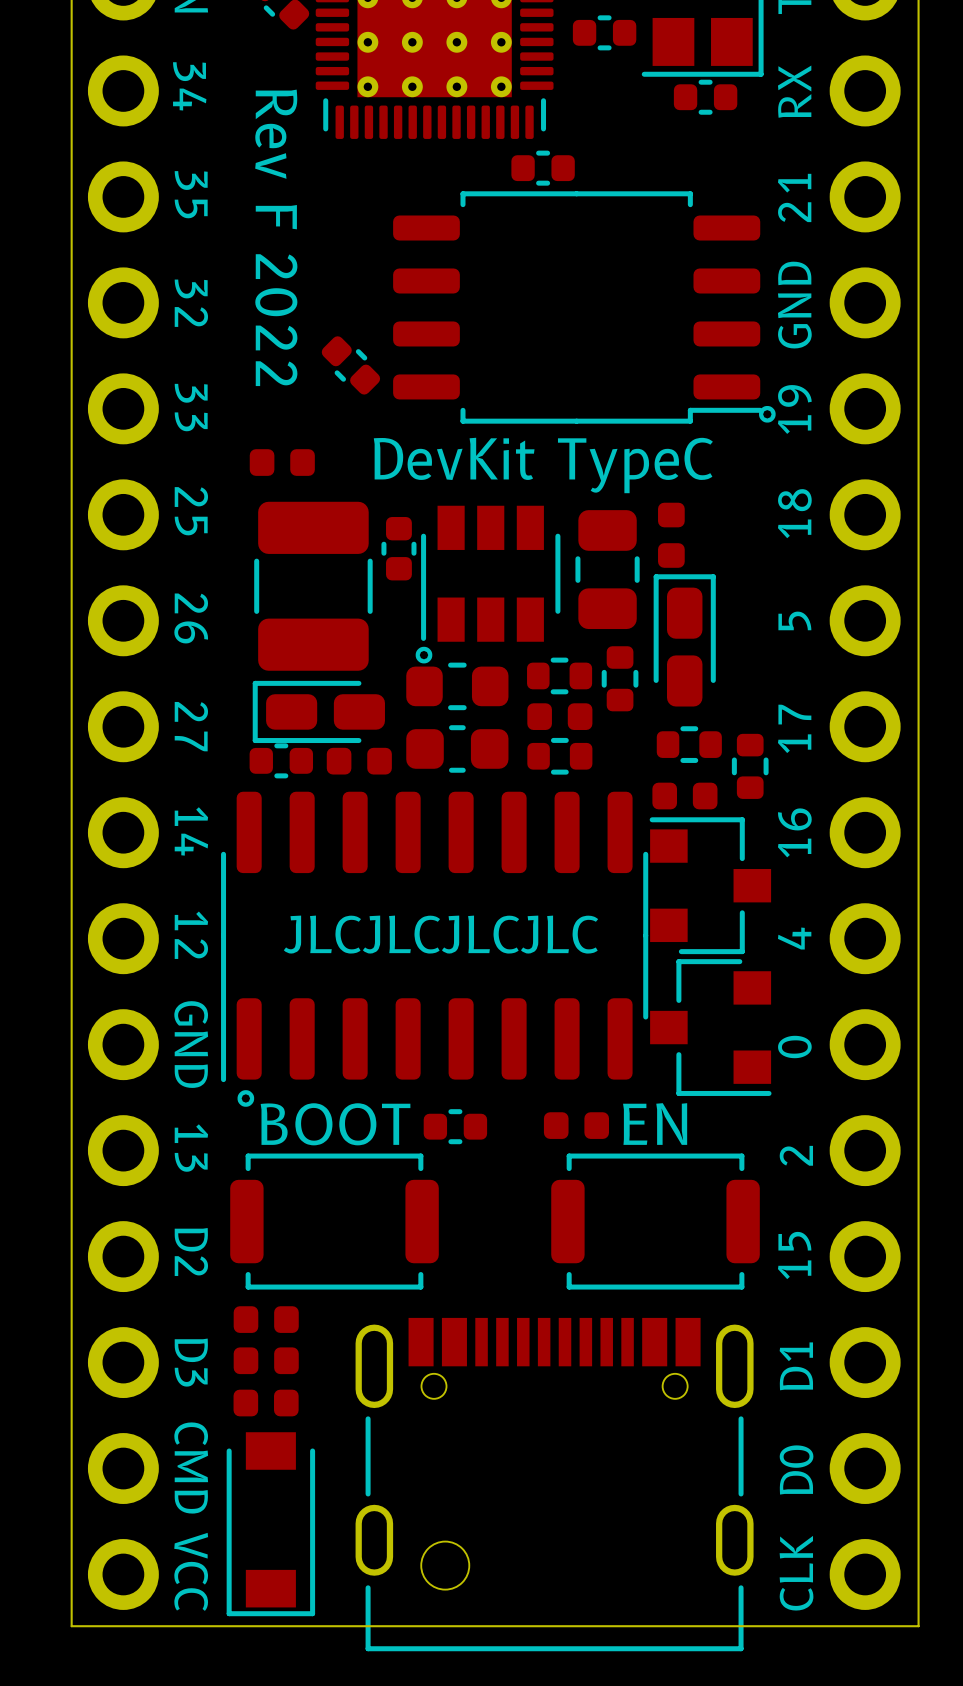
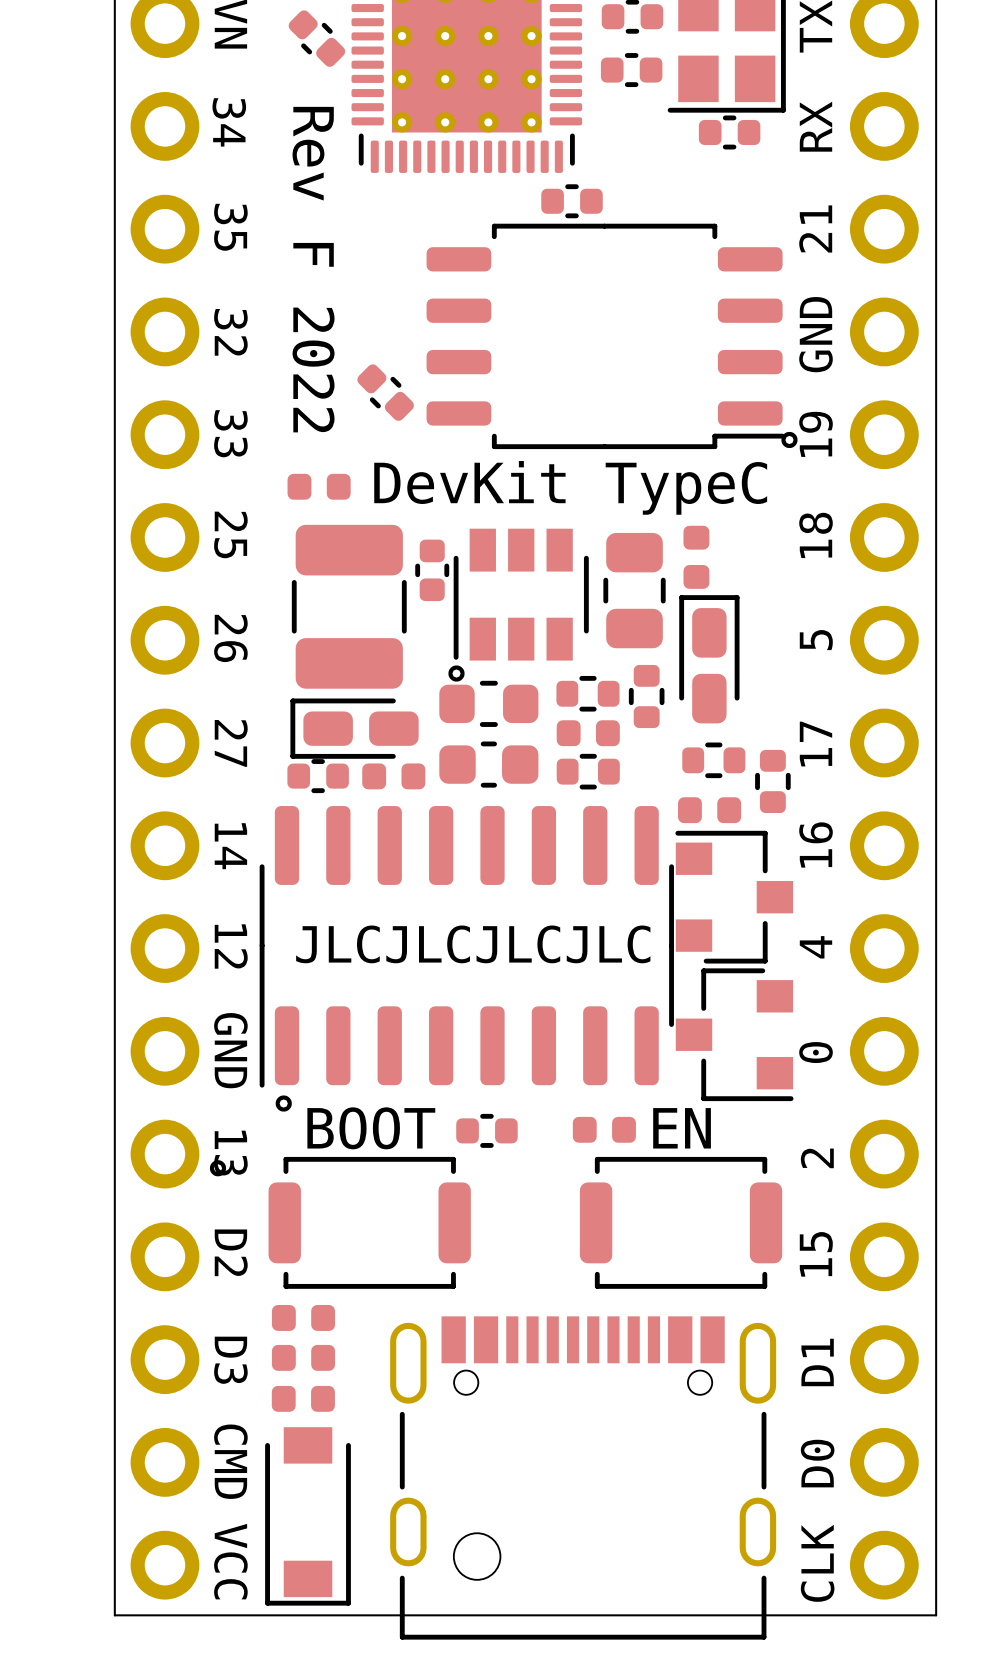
drawing: none -> [209, 1160, 227, 1177]

